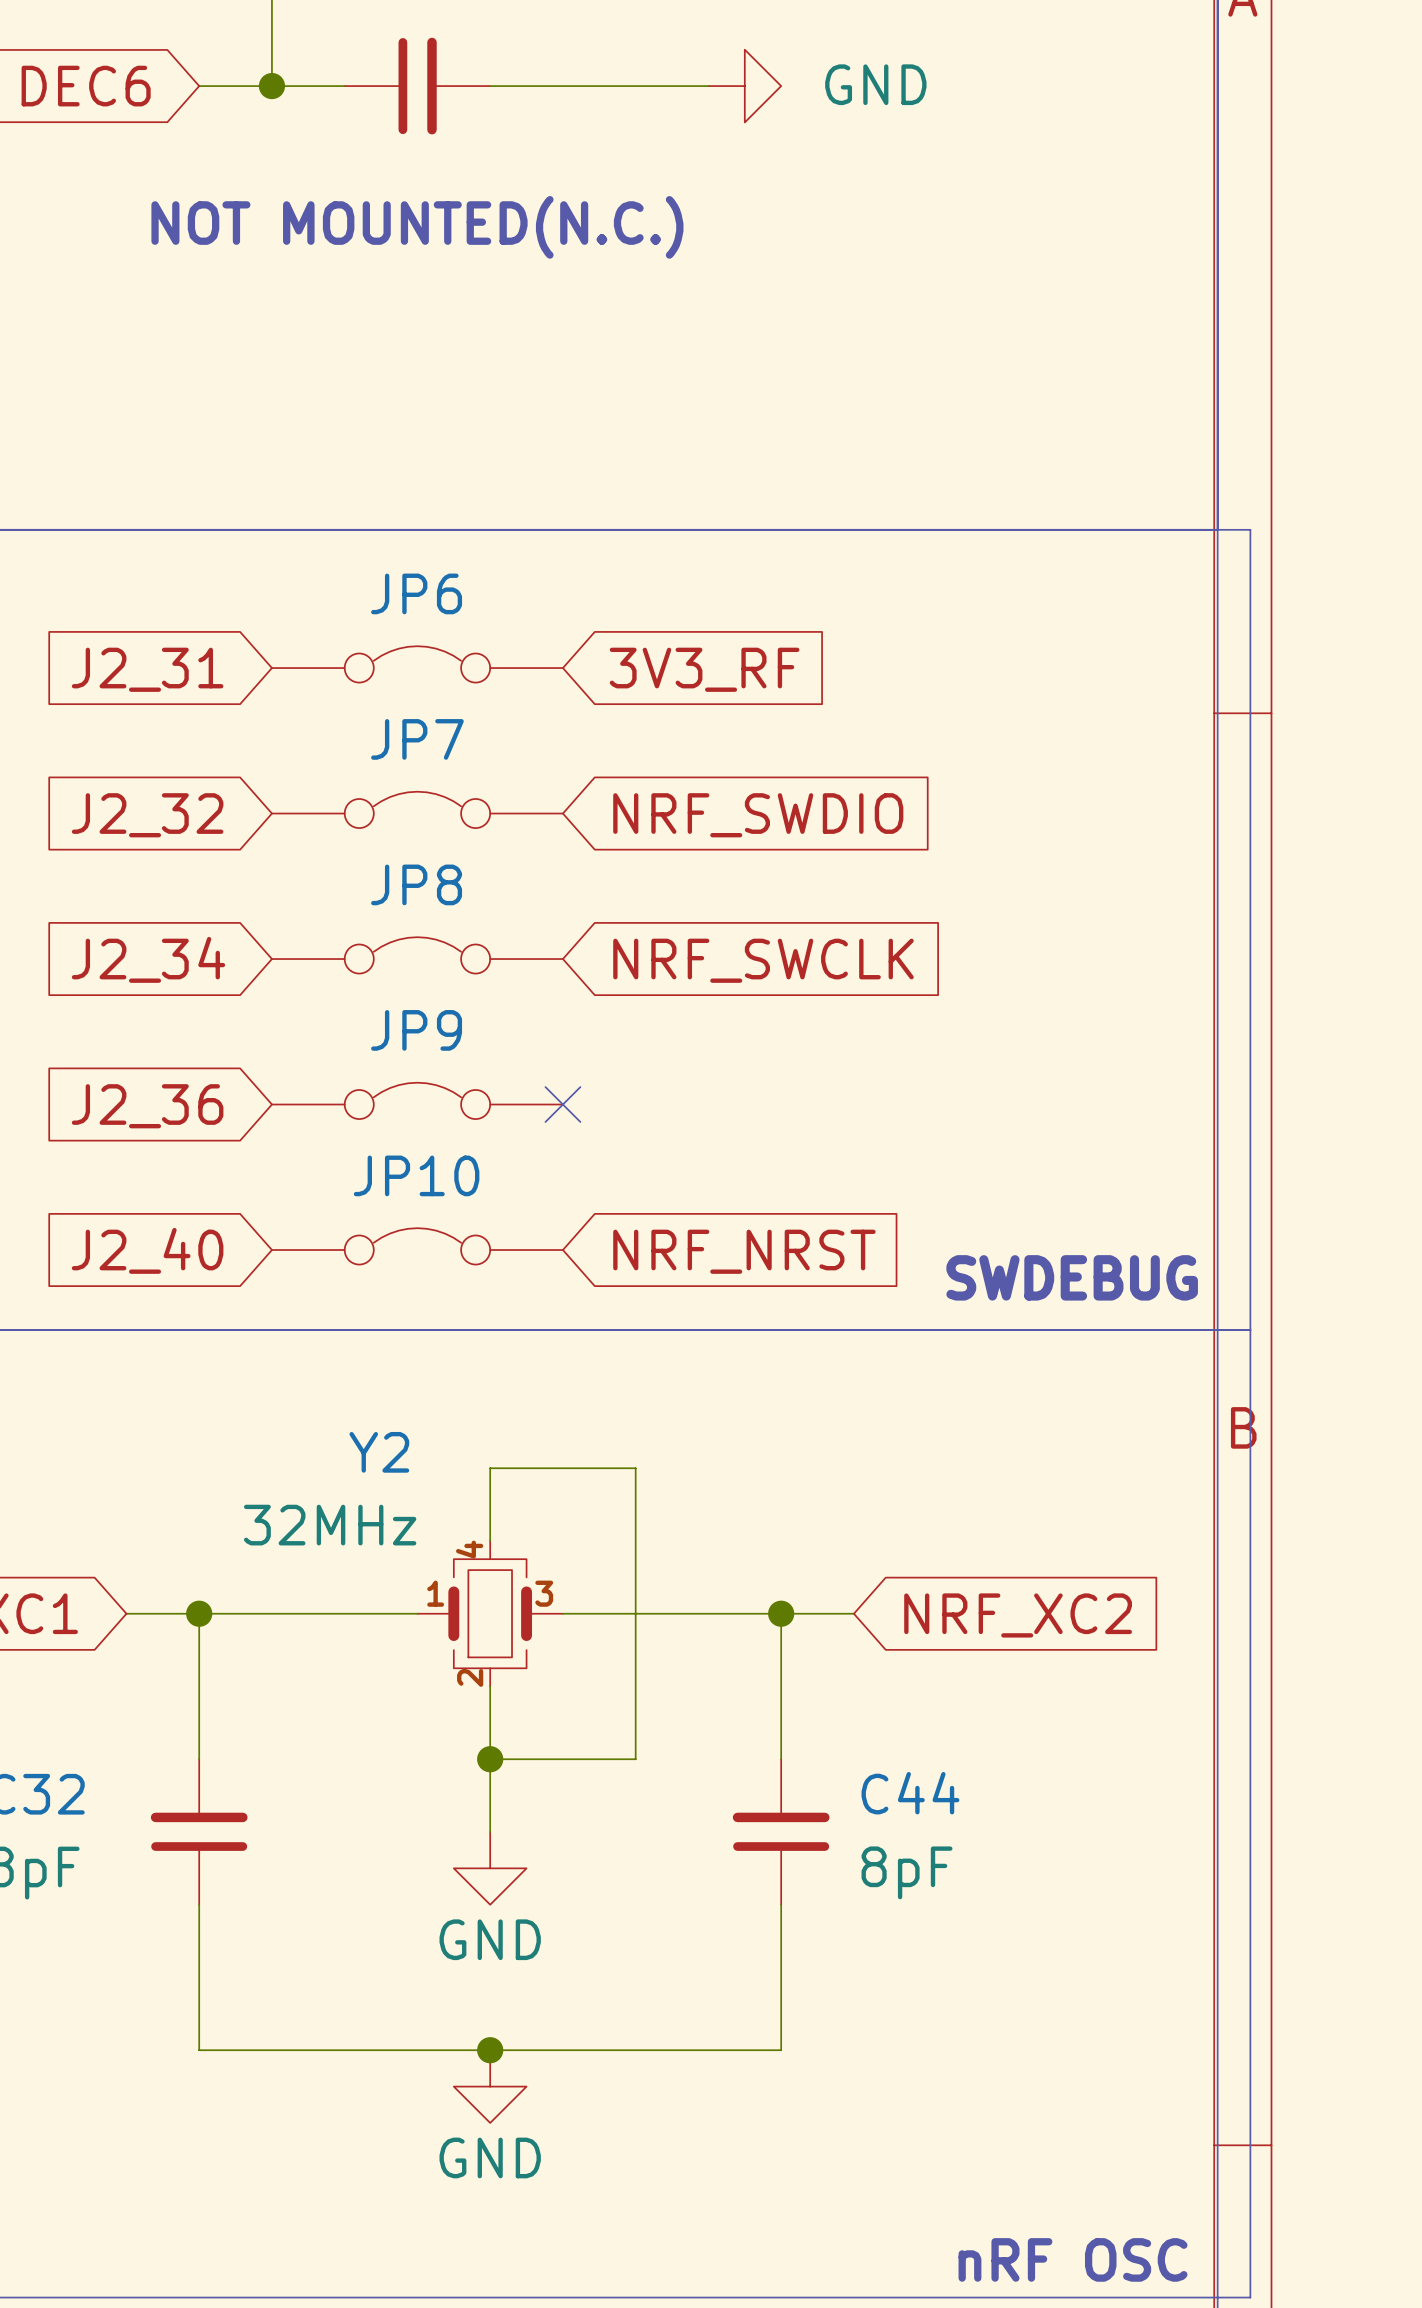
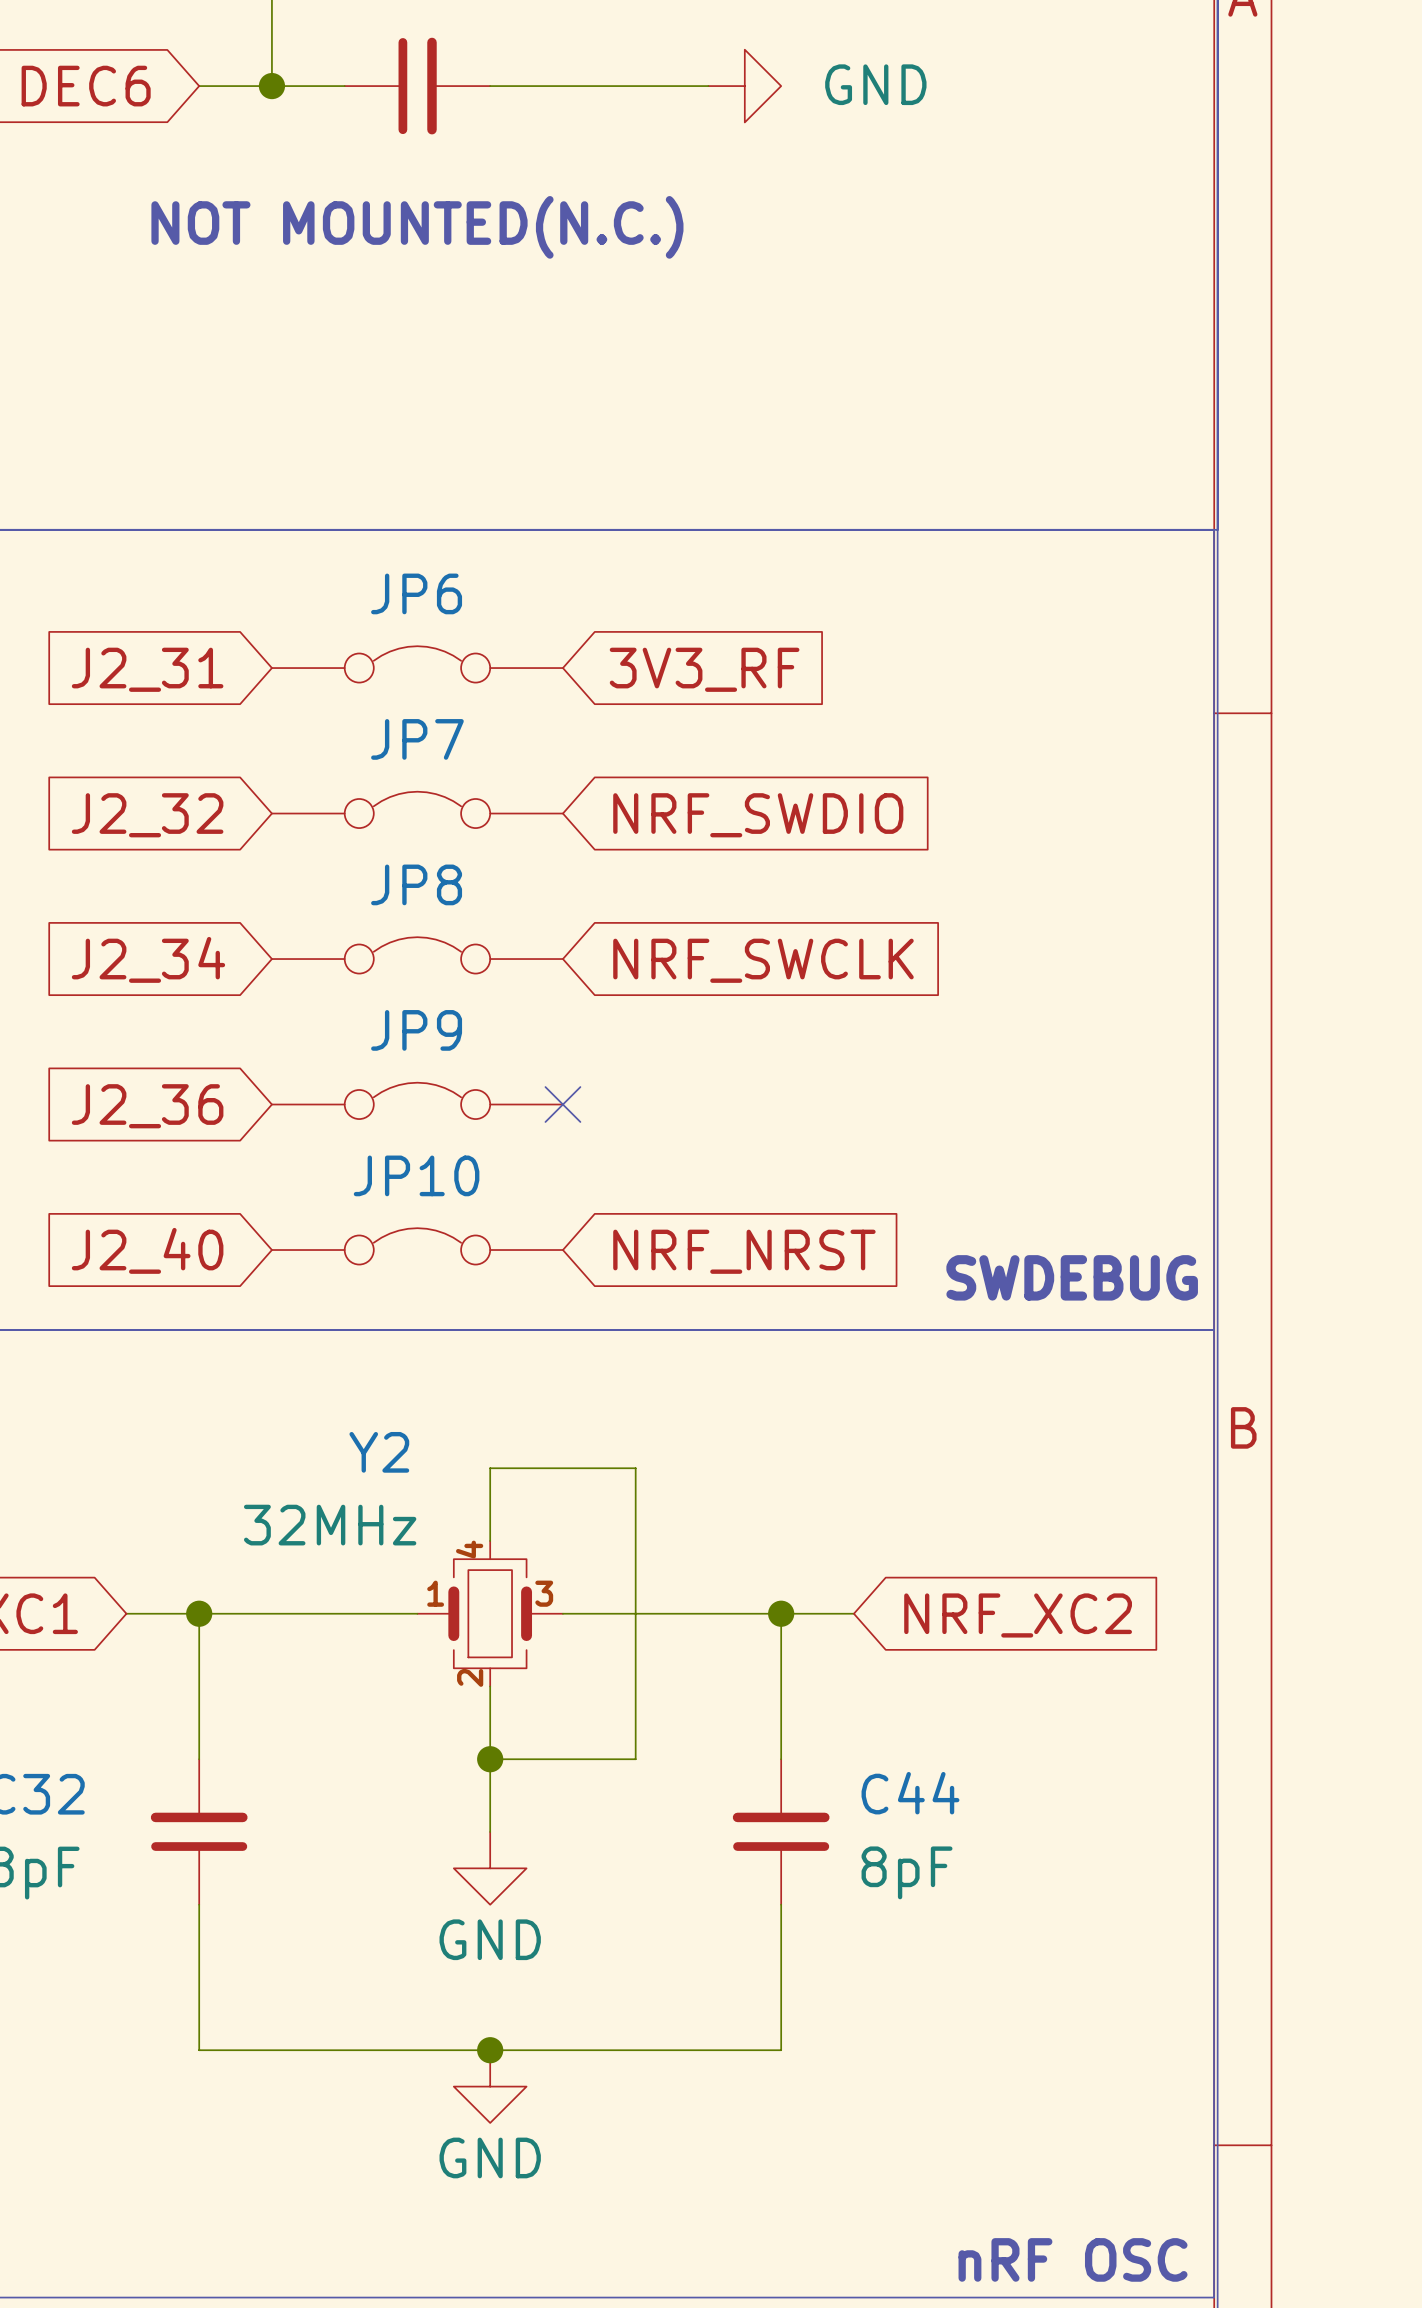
line: (1217, 529) (1250, 529) (1250, 2297) (1214, 2297) -> (1214, 529) (1214, 2297)
line: (1214, 1330) (1250, 1330) -> none

